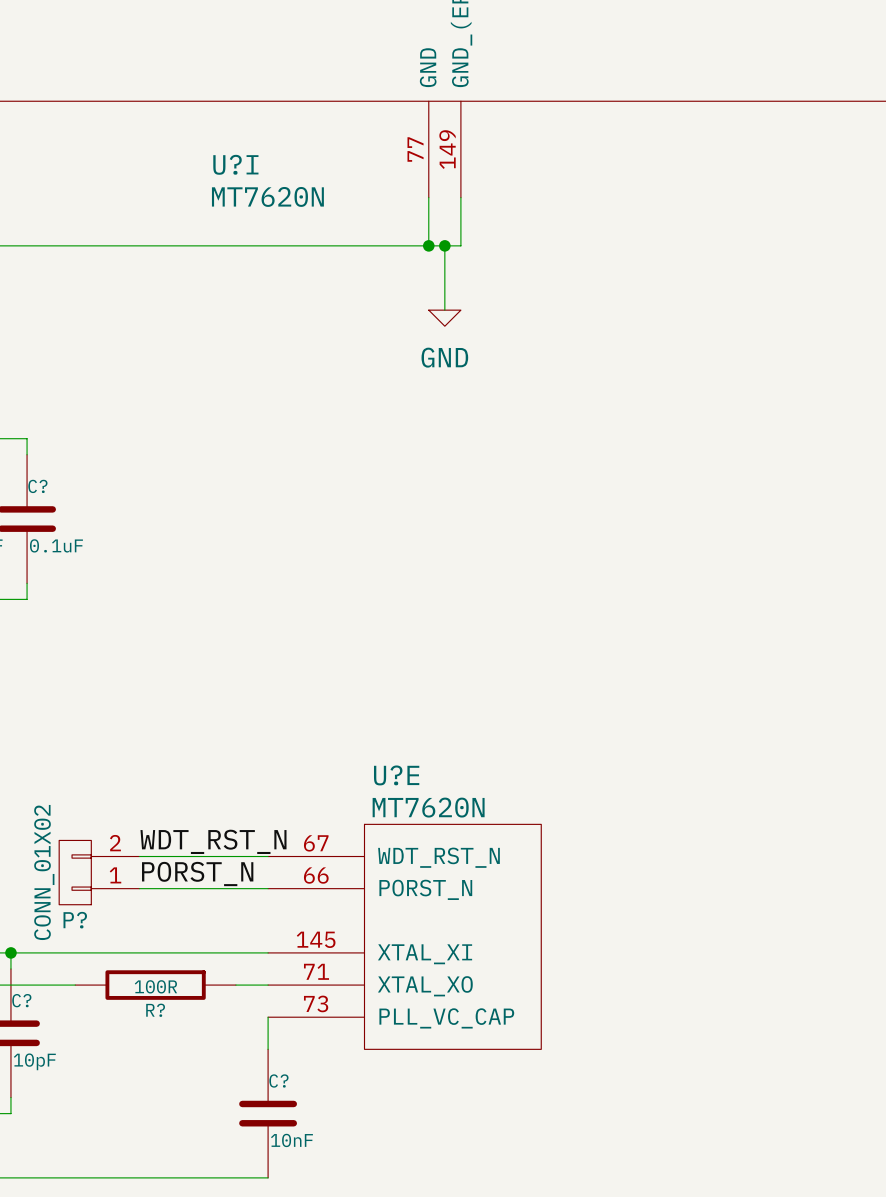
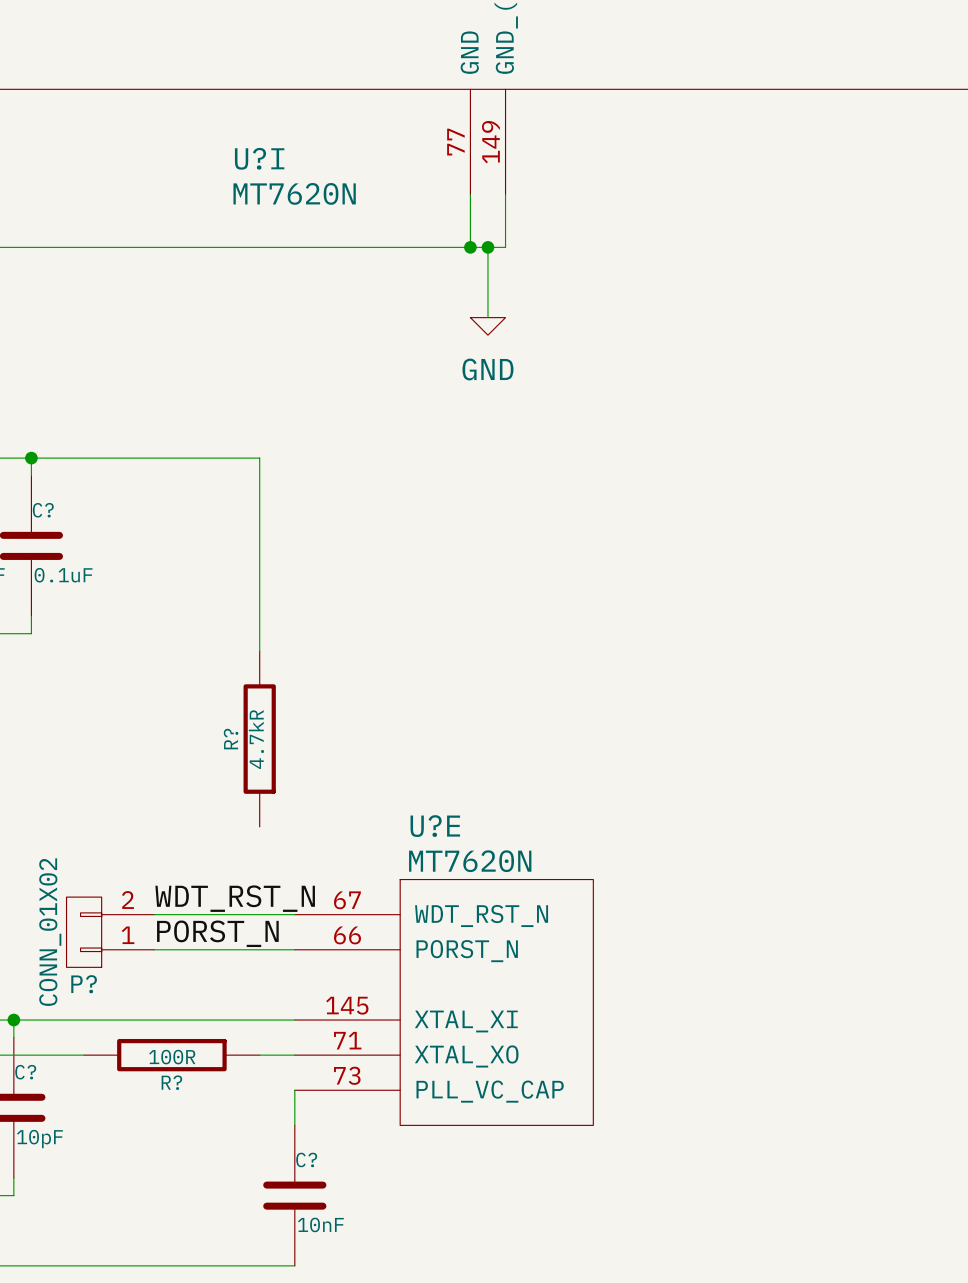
wire: none -> (31, 458) (259, 458) (259, 651)
junction: none -> (31, 458)
R?: none -> 4.7kR (259, 739)

